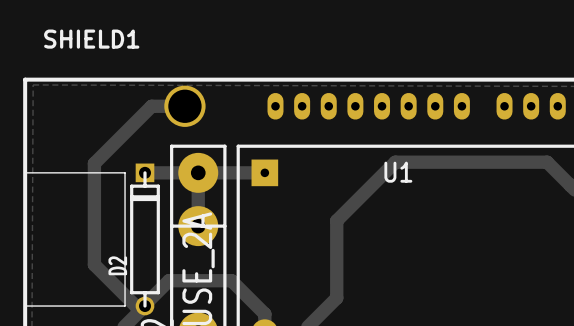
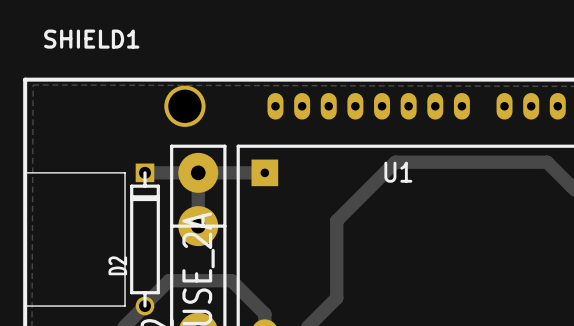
track: (184, 106) (151, 106) (94, 163) (94, 264) (135, 306) (145, 306) -> none

